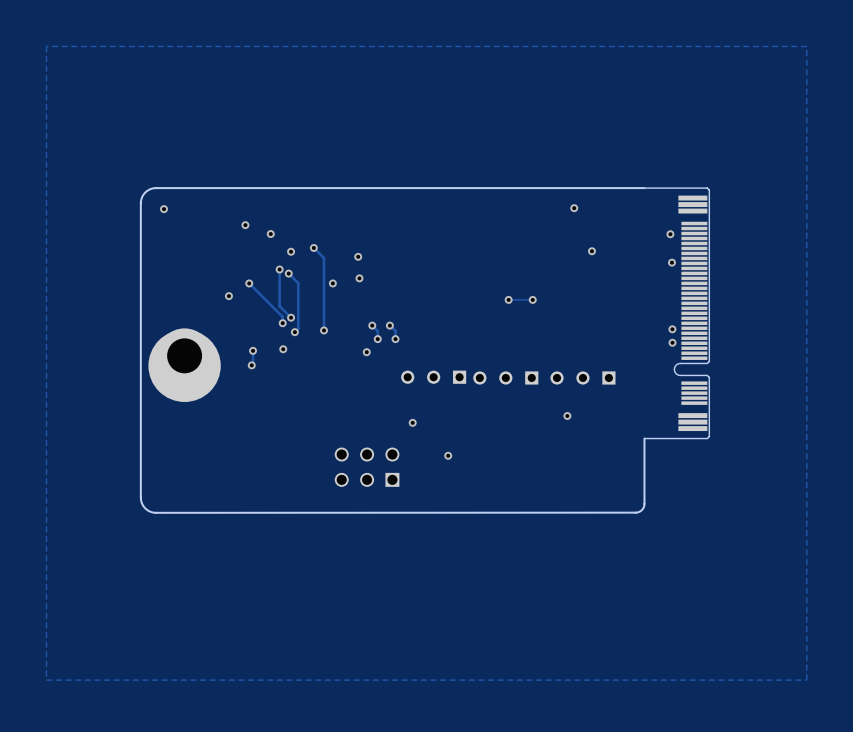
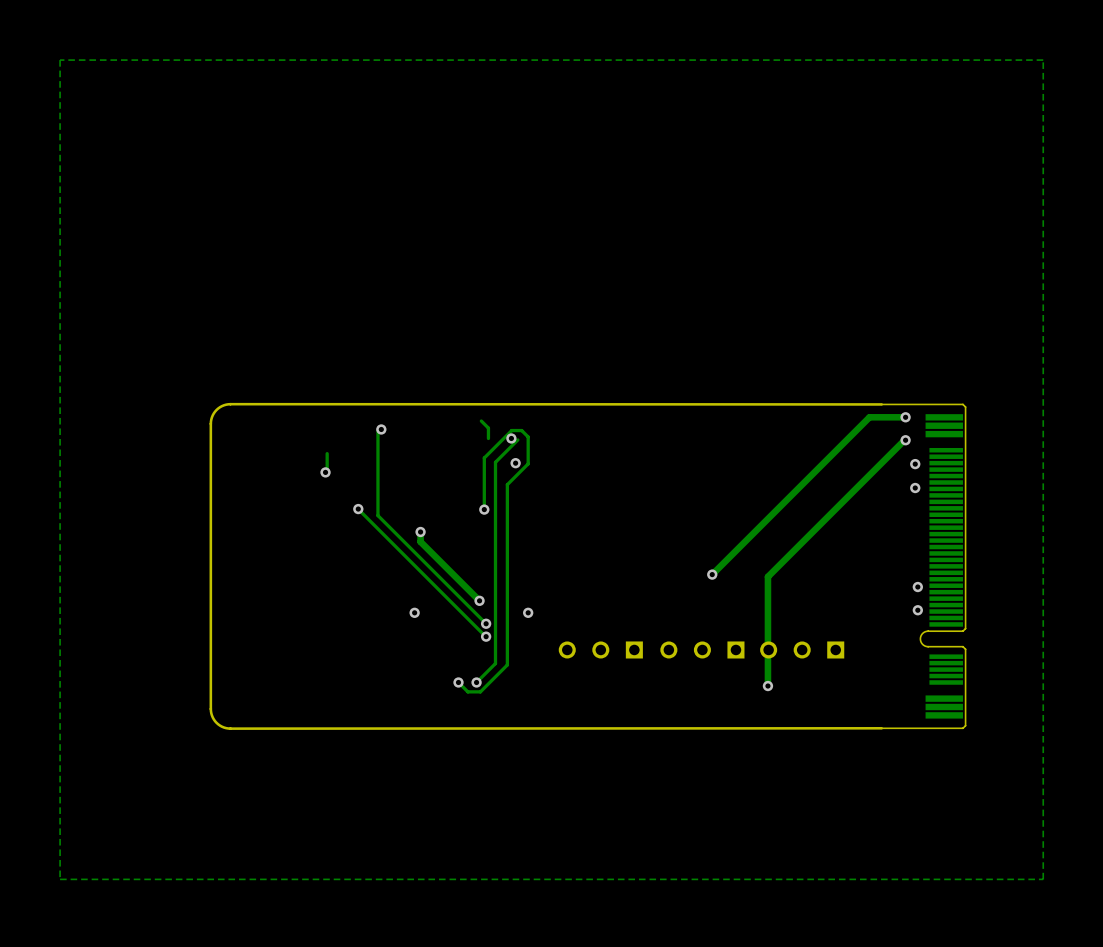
board edge: (644, 188) (156, 188) (147, 190) (142, 196) (140, 203) (140, 499) (146, 509) (156, 512) (636, 512) (641, 510) (644, 504) (644, 438) -> none
via: (574, 208) -> none
via: (164, 209) -> none
via: (245, 225) -> none
via: (270, 234) -> none
via: (670, 234) -> none
track: (313, 247) (323, 258) (323, 330) -> none
via: (313, 247) -> none
via: (291, 251) -> none
via: (591, 251) -> none
via: (358, 256) -> none
via: (671, 262) -> none
track: (279, 269) (279, 306) (291, 317) -> none
via: (279, 269) -> none
track: (288, 273) (298, 283) (298, 328) (294, 332) -> none
via: (288, 273) -> none
via: (359, 278) -> none
track: (249, 283) (282, 316) (282, 323) -> none
via: (249, 283) -> none
via: (332, 283) -> none
via: (228, 296) -> none
via: (508, 299) -> none
track: (532, 299) (508, 299) -> none
via: (532, 299) -> none
board edge: none -> (881, 404) (230, 404) (216, 409) (210, 423) (210, 708) (213, 719) (221, 726) (230, 728) (881, 728)
part position: (676, 313) -> (923, 566)
via: (291, 317) -> none
track: none -> (905, 417) (869, 417) (712, 574)
via: none -> (905, 417)
via: (282, 323) -> none
via: (372, 325) -> none
track: (389, 325) (395, 330) (395, 339) -> none
via: (389, 325) -> none
via: (672, 329) -> none
via: (323, 330) -> none
track: none -> (377, 430) (377, 515) (486, 623)
via: (377, 339) -> none
track: none -> (517, 439) (495, 462) (495, 663) (476, 682)
track: none -> (905, 440) (767, 576) (767, 686)
via: none -> (905, 440)
via: (672, 342) -> none
via: (283, 349) -> none
via: (253, 350) -> none
via: (366, 352) -> none
via: none -> (515, 463)
via: none -> (915, 464)
part: (184, 365) -> none
part: (433, 377) -> none
part: (505, 377) -> none
part: (582, 377) -> none
via: none -> (915, 488)
track: none -> (358, 509) (486, 636)
via: none -> (358, 509)
track: none -> (484, 509) (484, 457) (511, 430) (521, 430) (528, 436) (528, 463) (507, 484) (507, 664) (480, 691) (467, 691) (458, 682)
via: none -> (484, 509)
track: none -> (420, 531) (420, 541) (479, 600)
via: none -> (420, 531)
via position: (567, 416) -> (712, 574)
via: (412, 422) -> none
via: none -> (917, 587)
via: (448, 455) -> none
via: none -> (479, 600)
part: (367, 467) -> none
via: none -> (917, 610)
via: none -> (414, 612)
via: none -> (528, 612)
via: none -> (486, 623)
via: none -> (486, 636)
part: none -> (600, 649)
part: none -> (702, 649)
part: none -> (802, 649)
via: none -> (458, 682)
via: none -> (476, 682)
via: none -> (767, 686)

